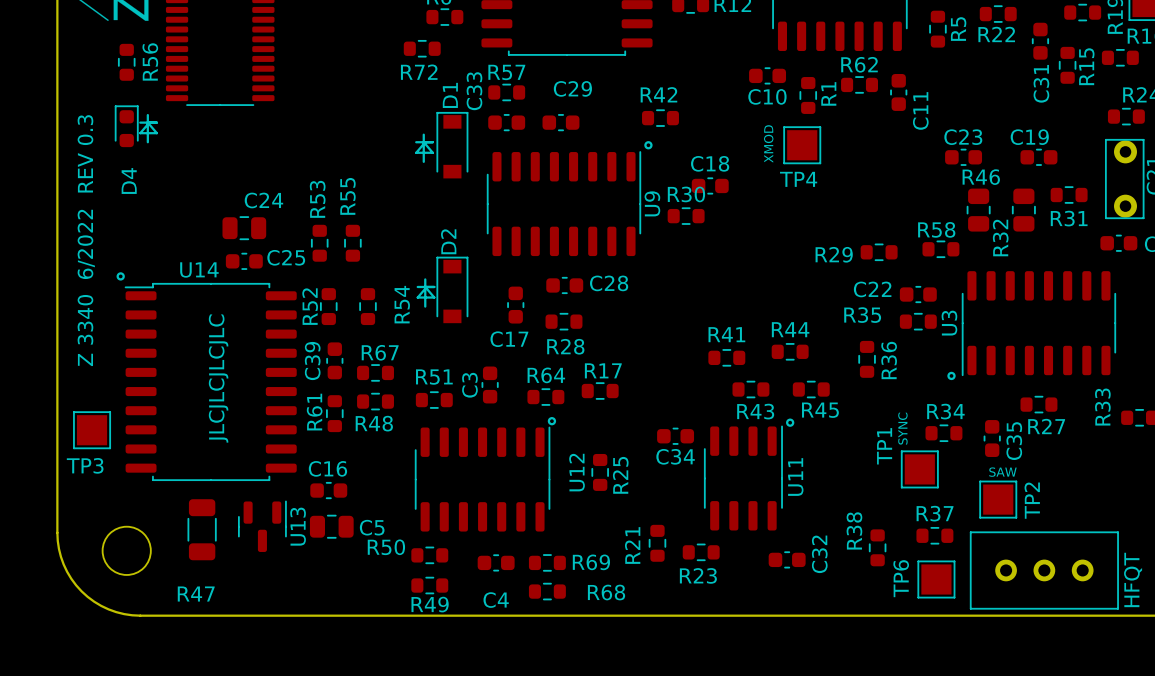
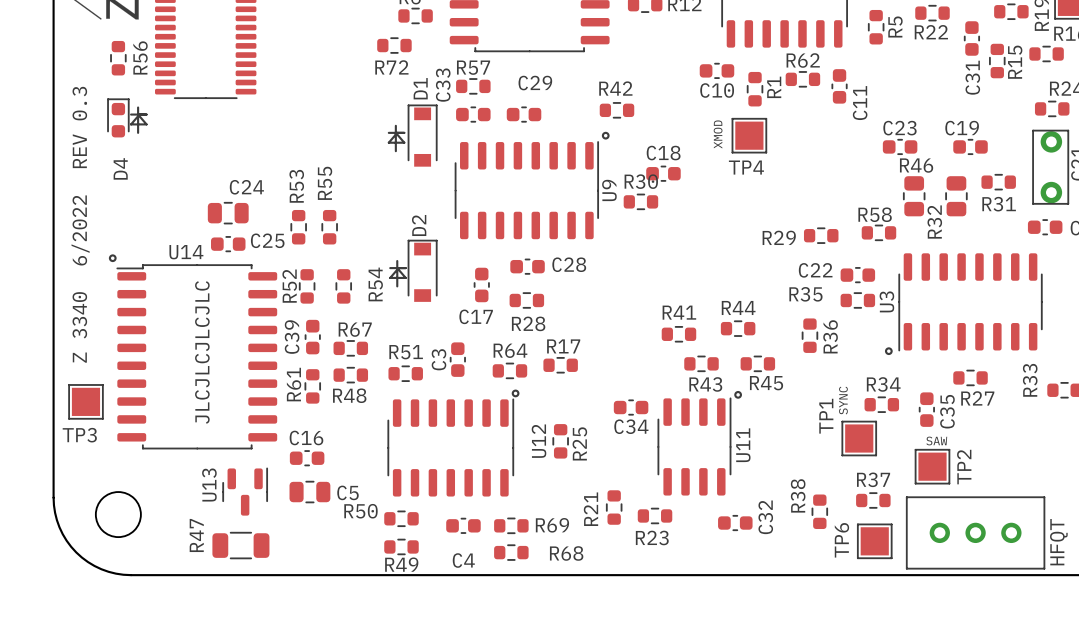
U13 name position: U13 (298, 526) -> U13 (209, 485)
R47 rotation: 0° (202, 529) -> 90° clockwise (240, 545)
R47 position: (202, 529) -> (240, 545)

